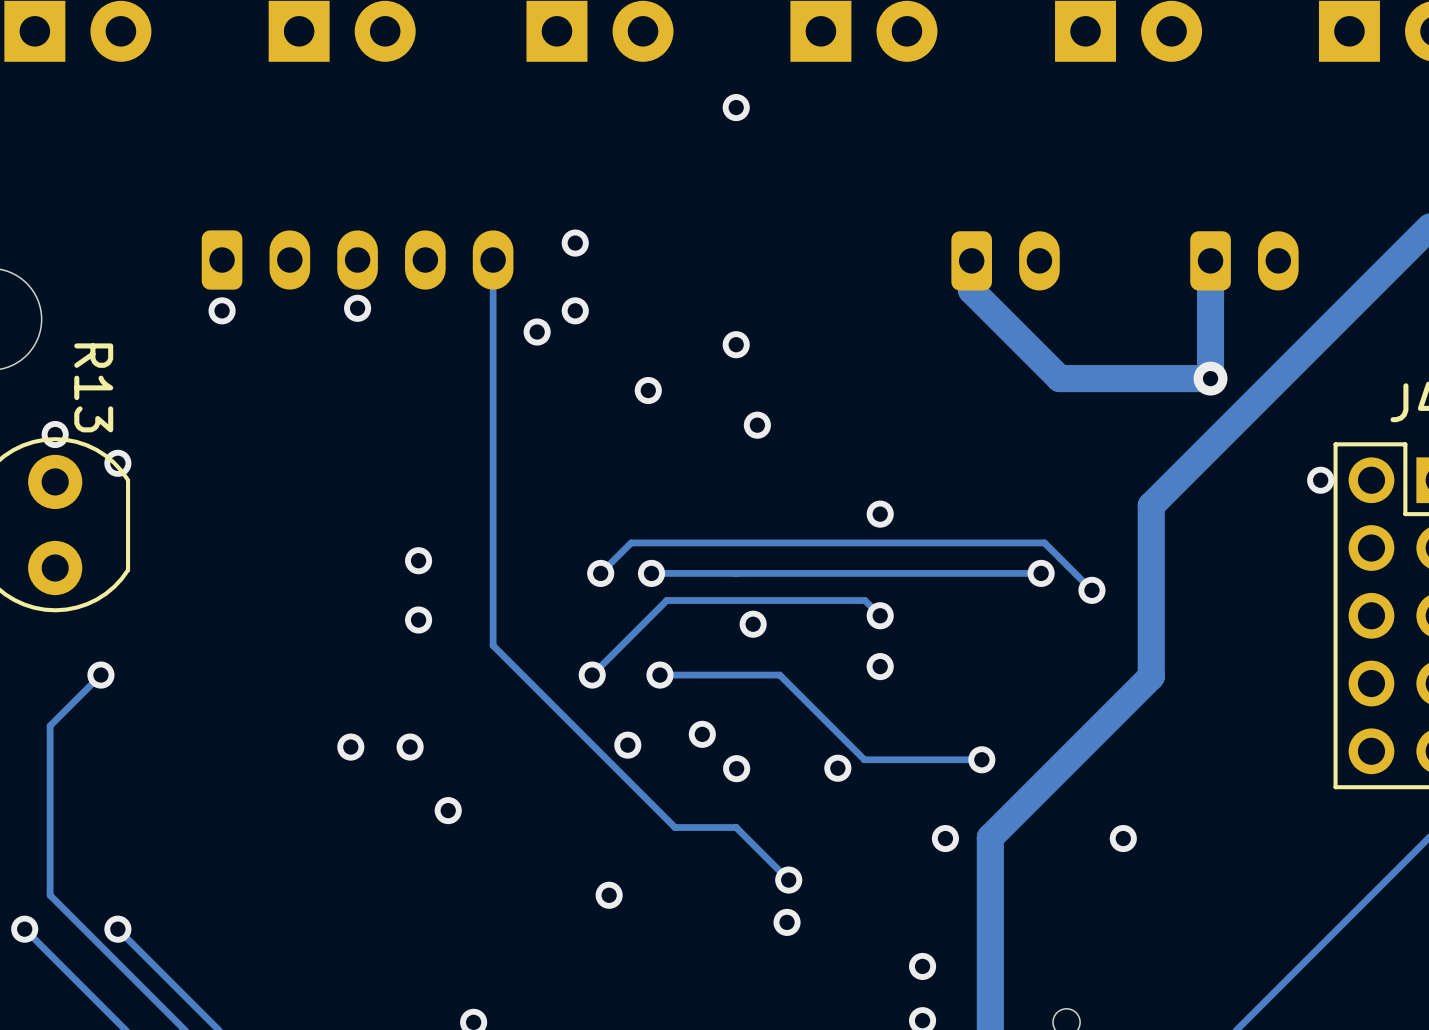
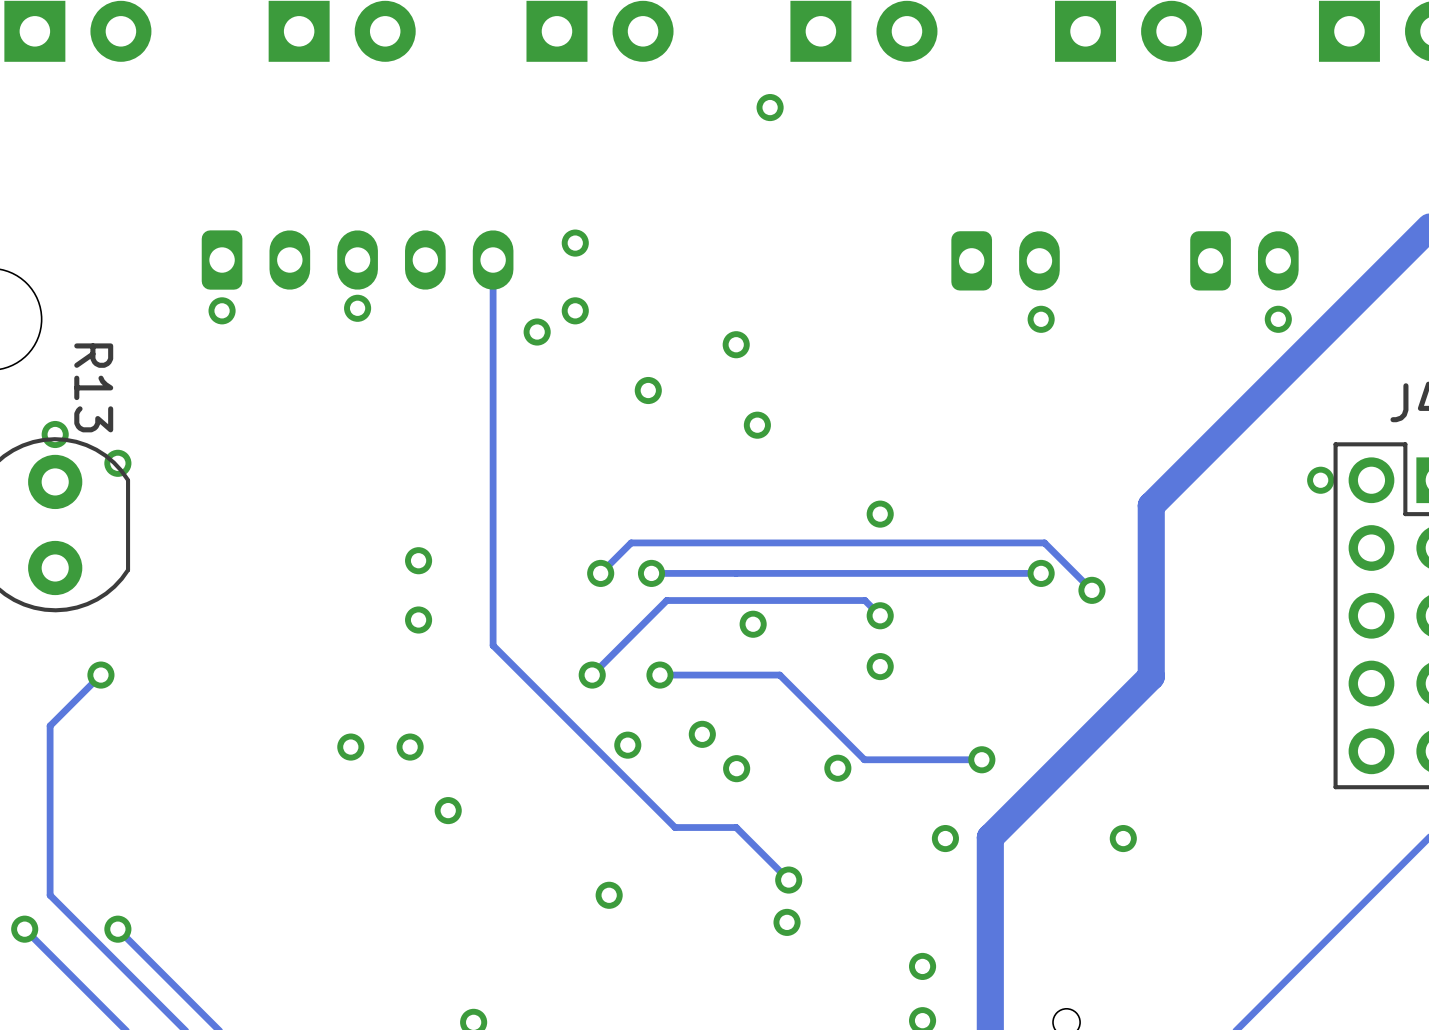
via position: (736, 107) -> (770, 107)
track: (1210, 260) (1210, 378) (1059, 378) (971, 290) (971, 260) -> none
via: none -> (1041, 319)
via: none -> (1278, 319)
via: (1210, 378) -> none

